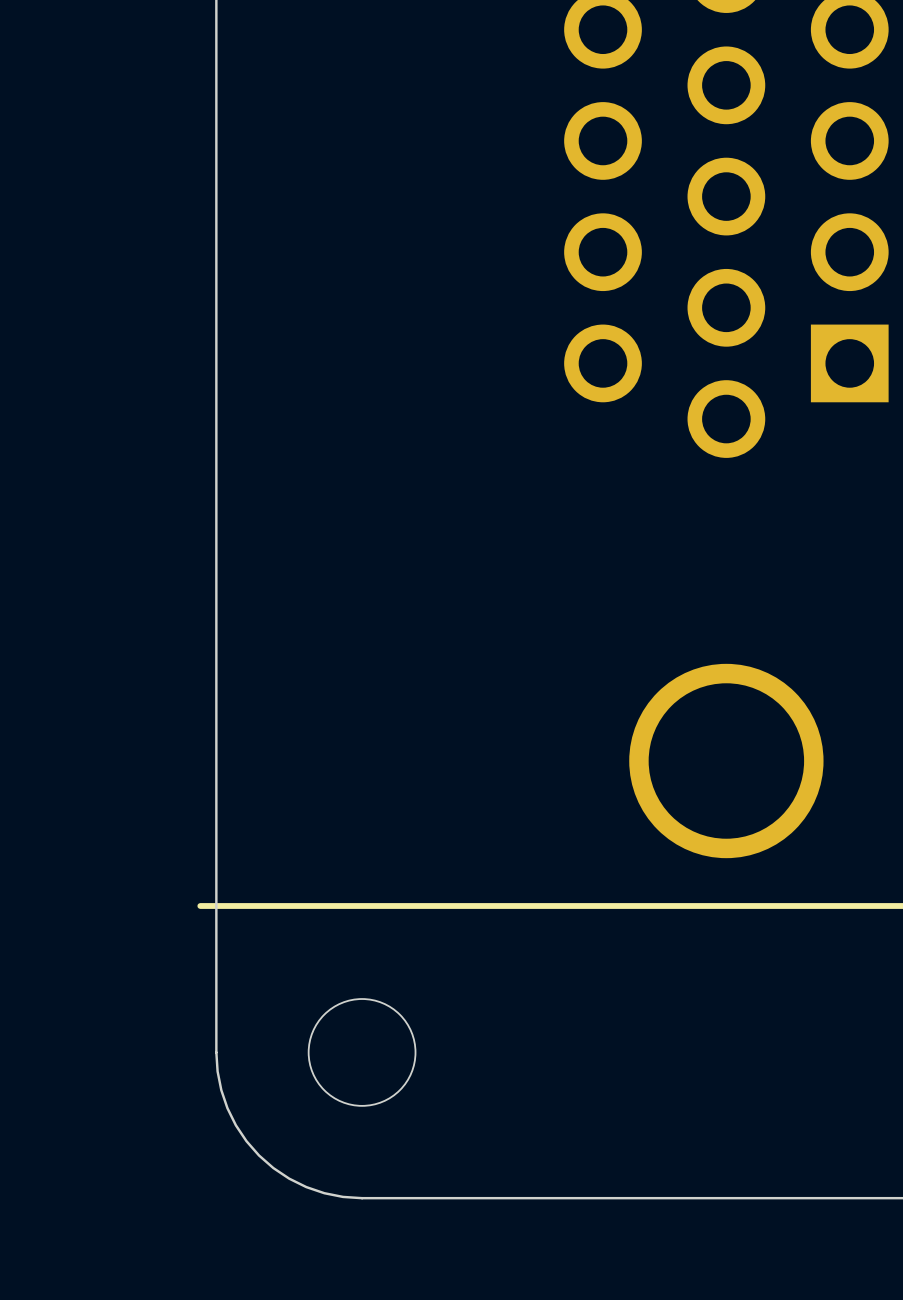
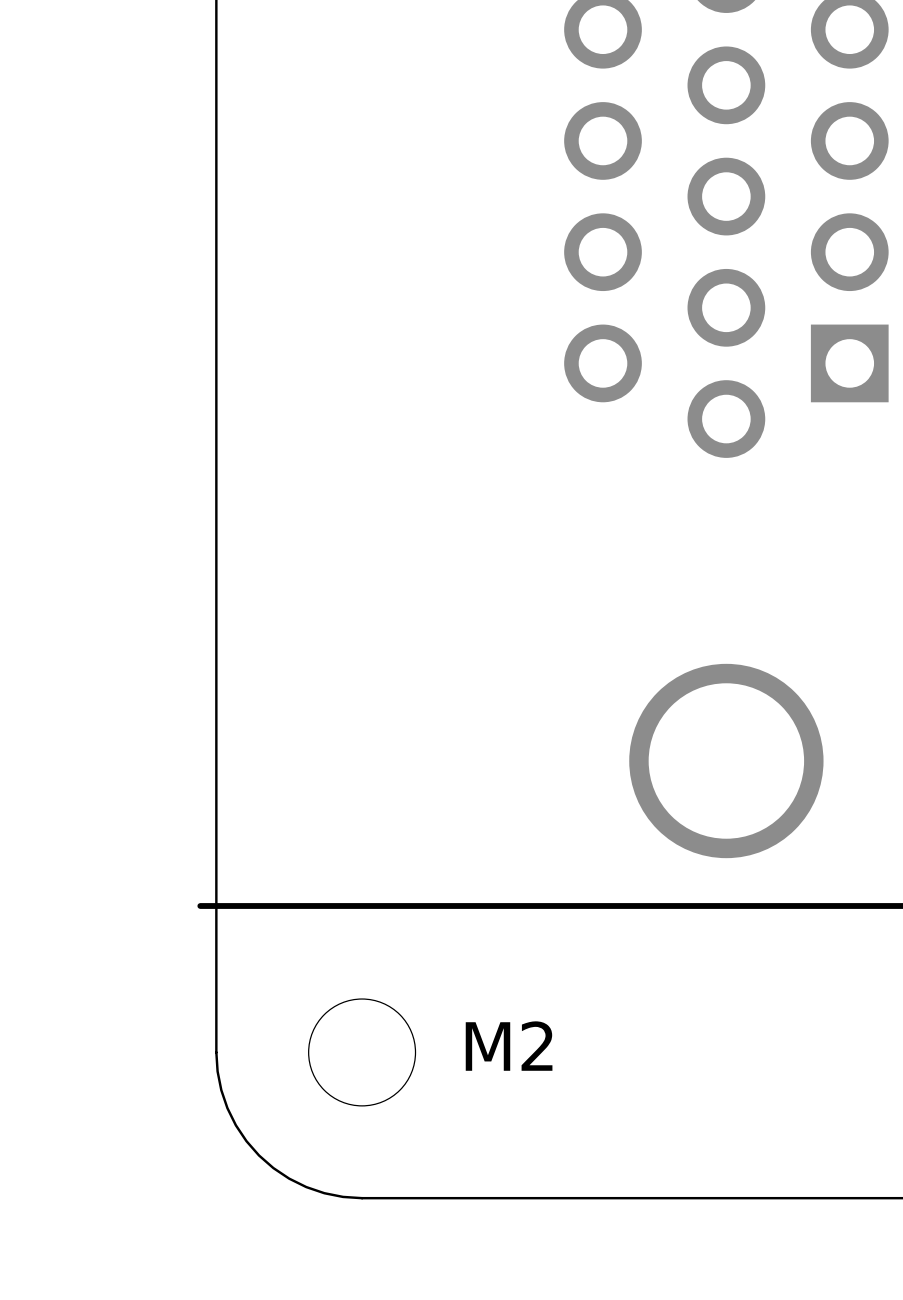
text: none -> M2 (509, 1046)

